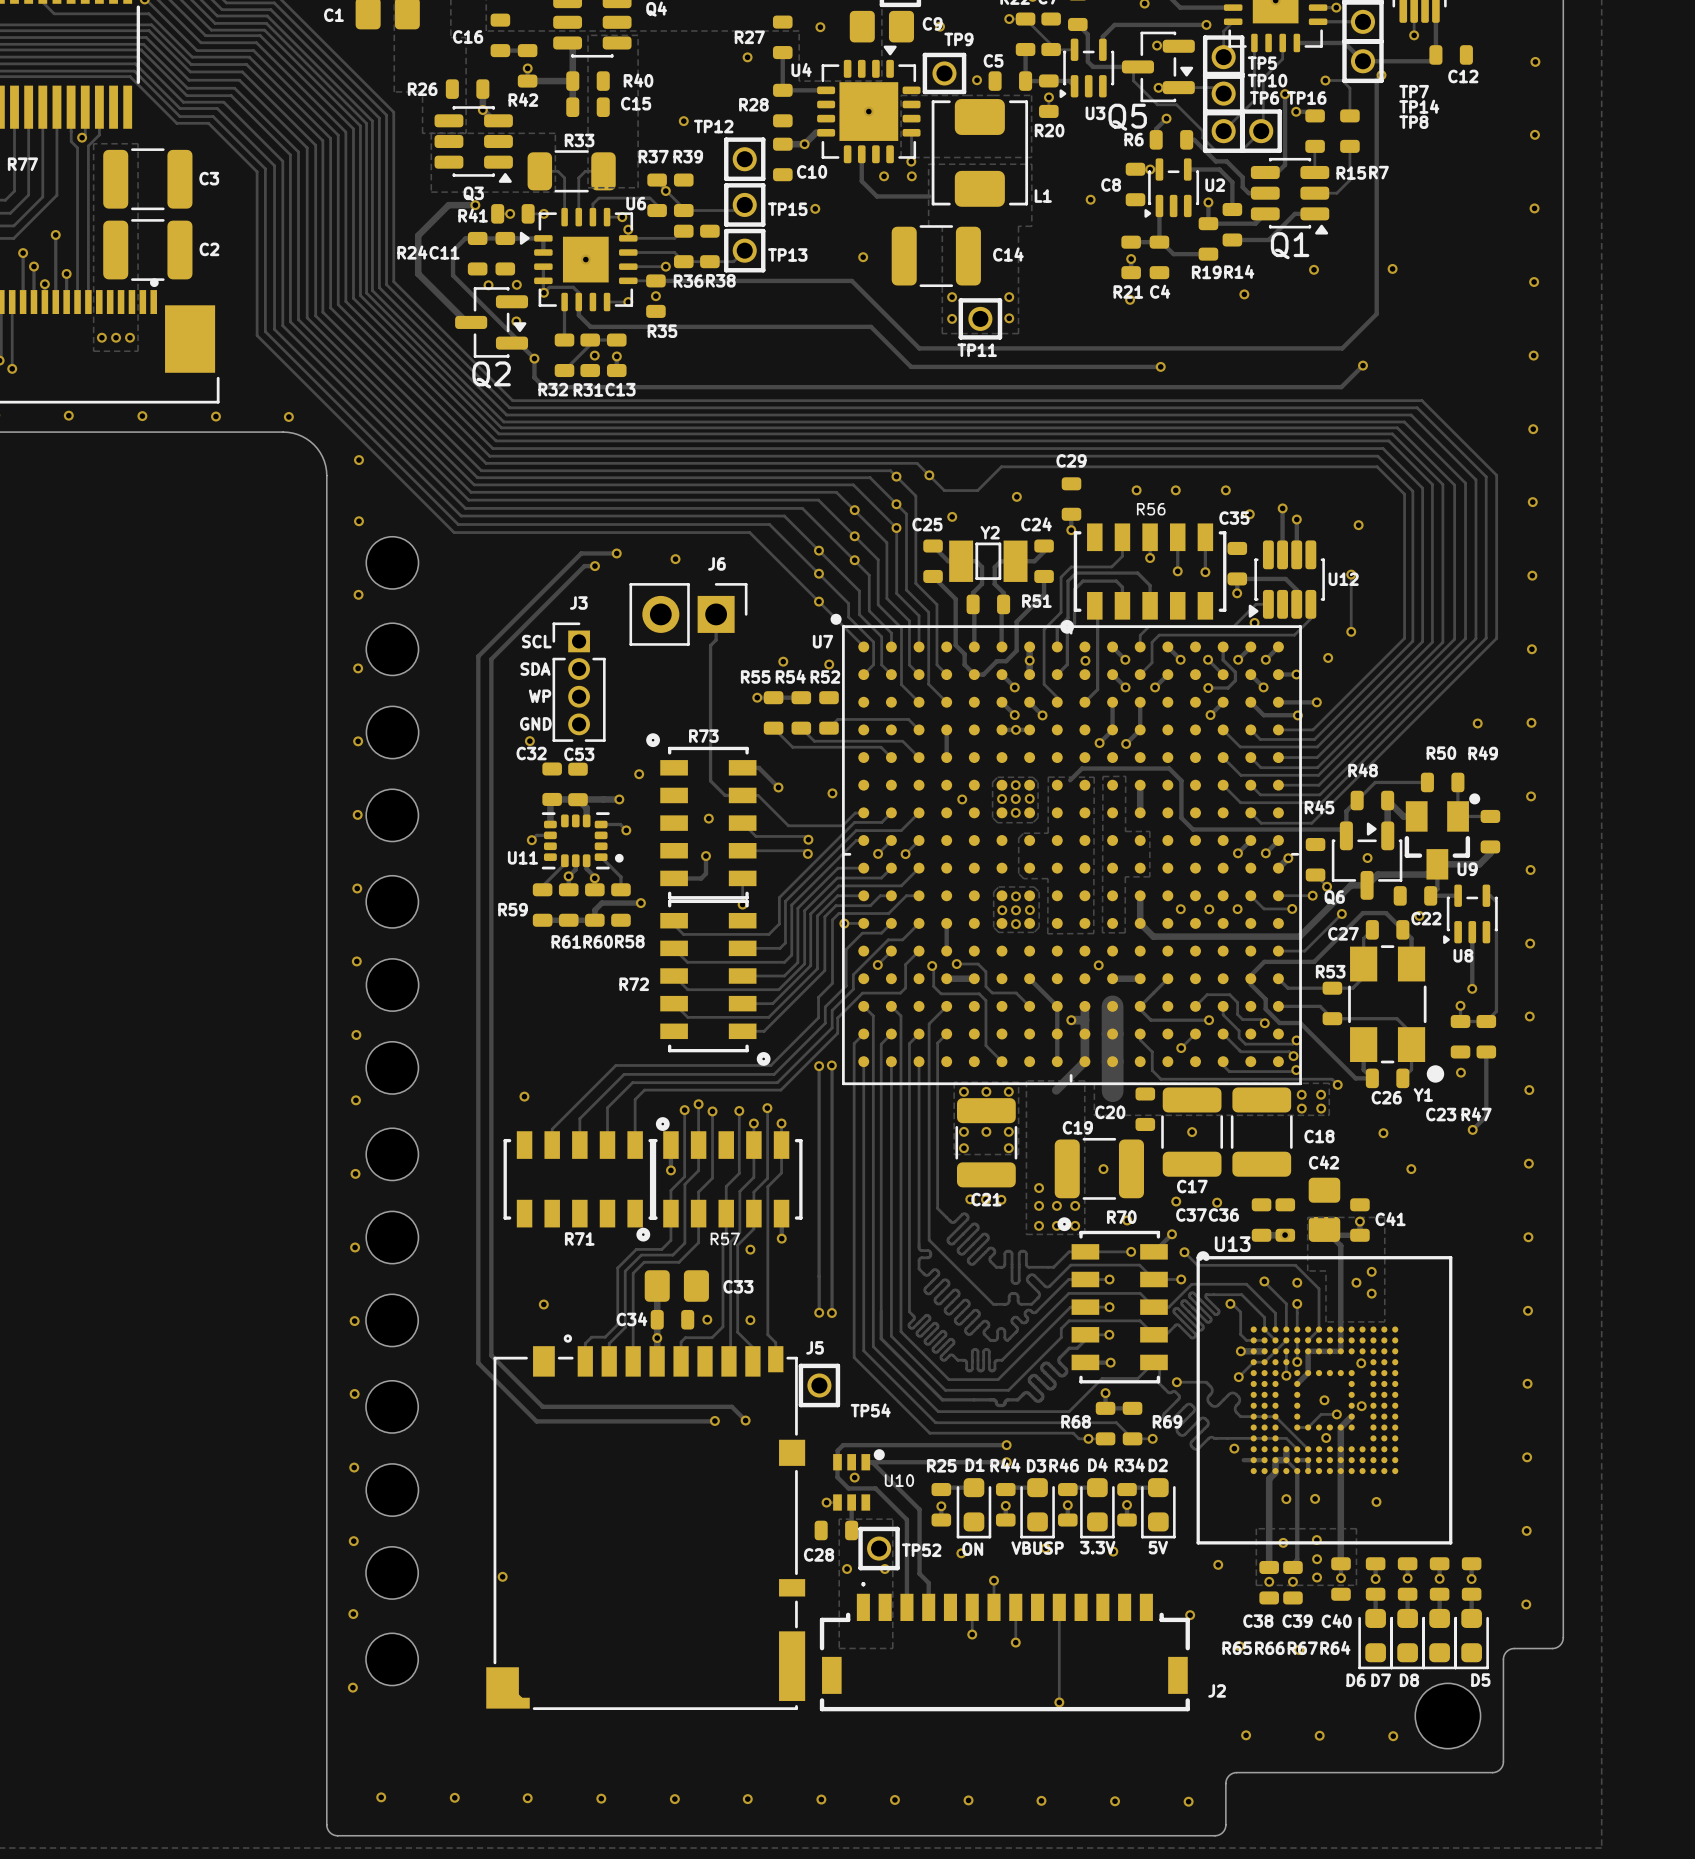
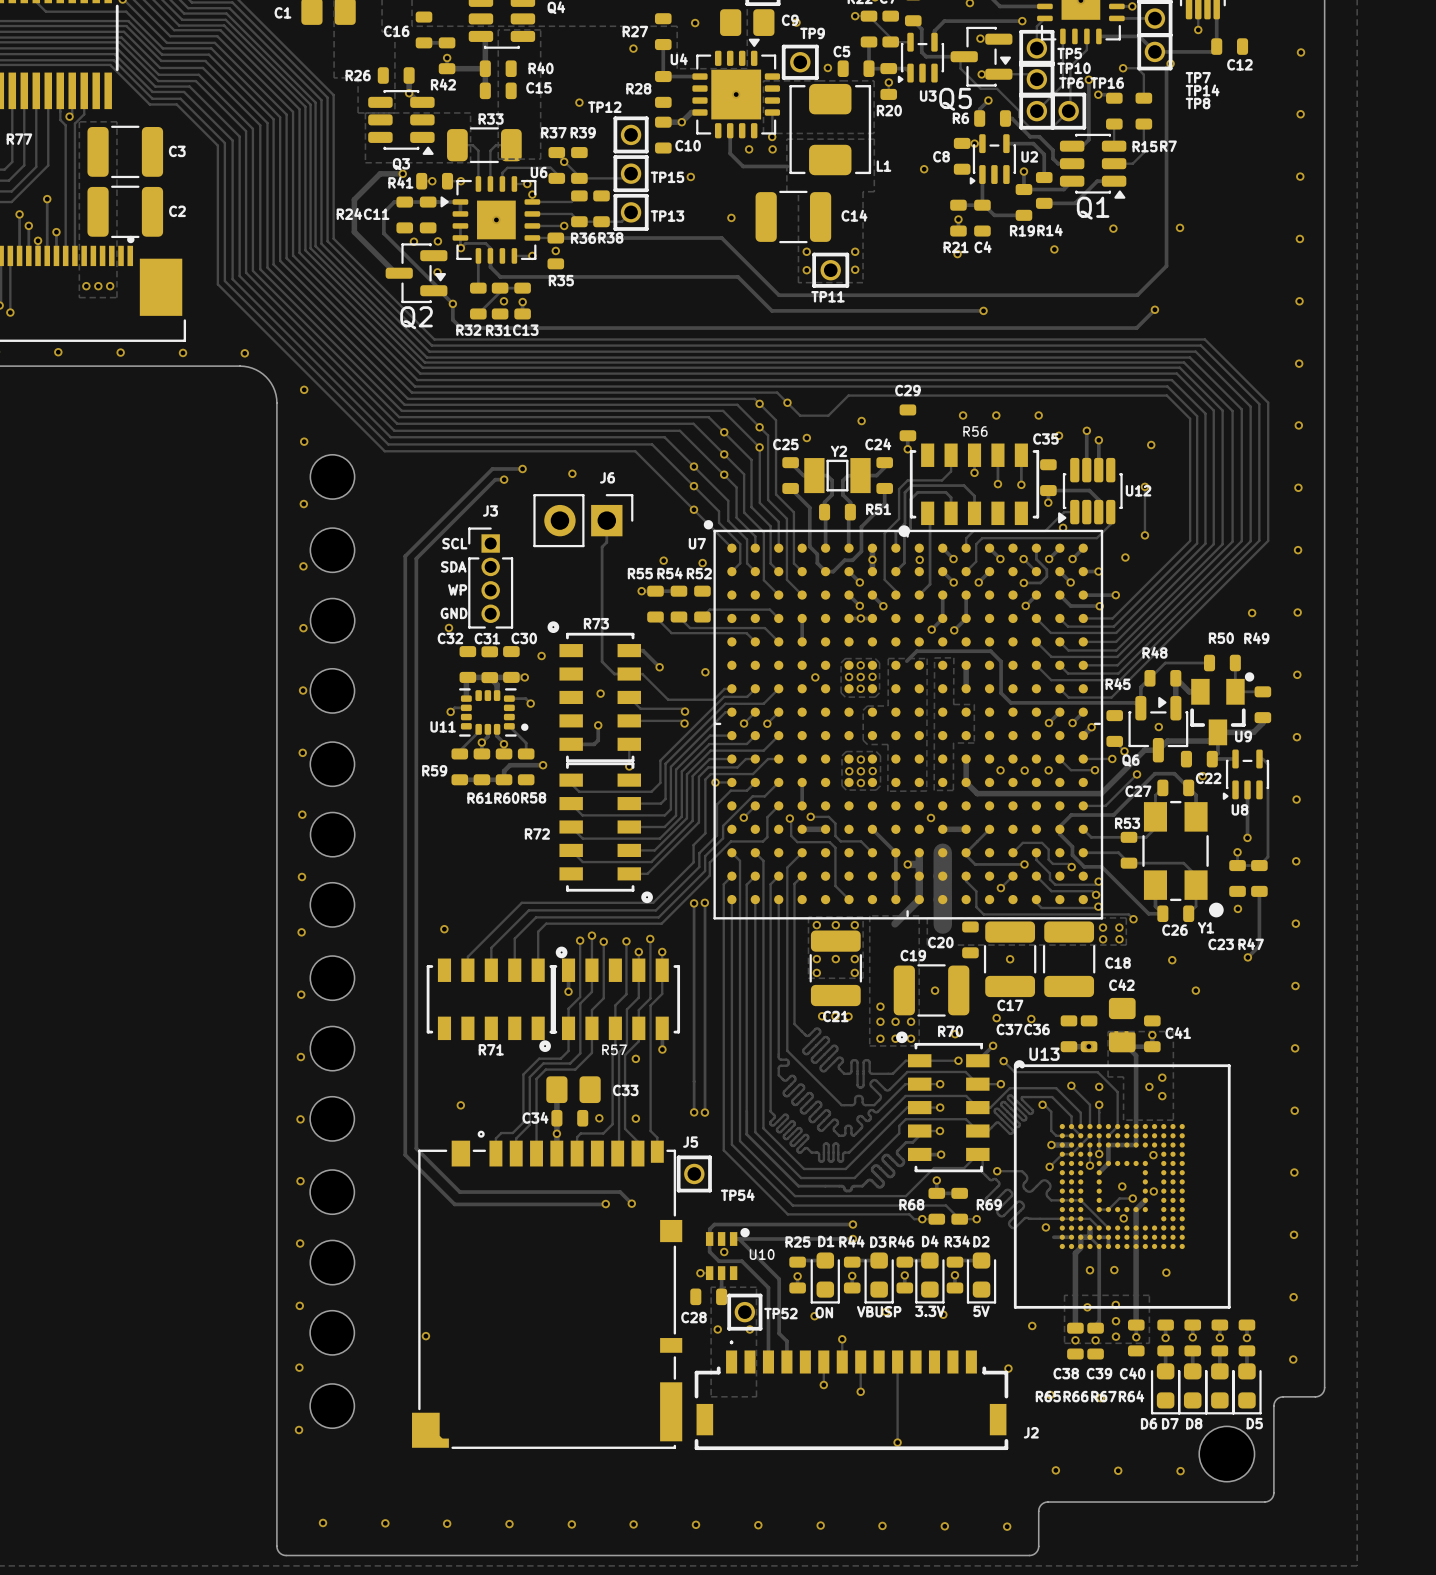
C53 name: C53 (579, 754) -> C31 (487, 638)
C30: none -> (511, 664)

